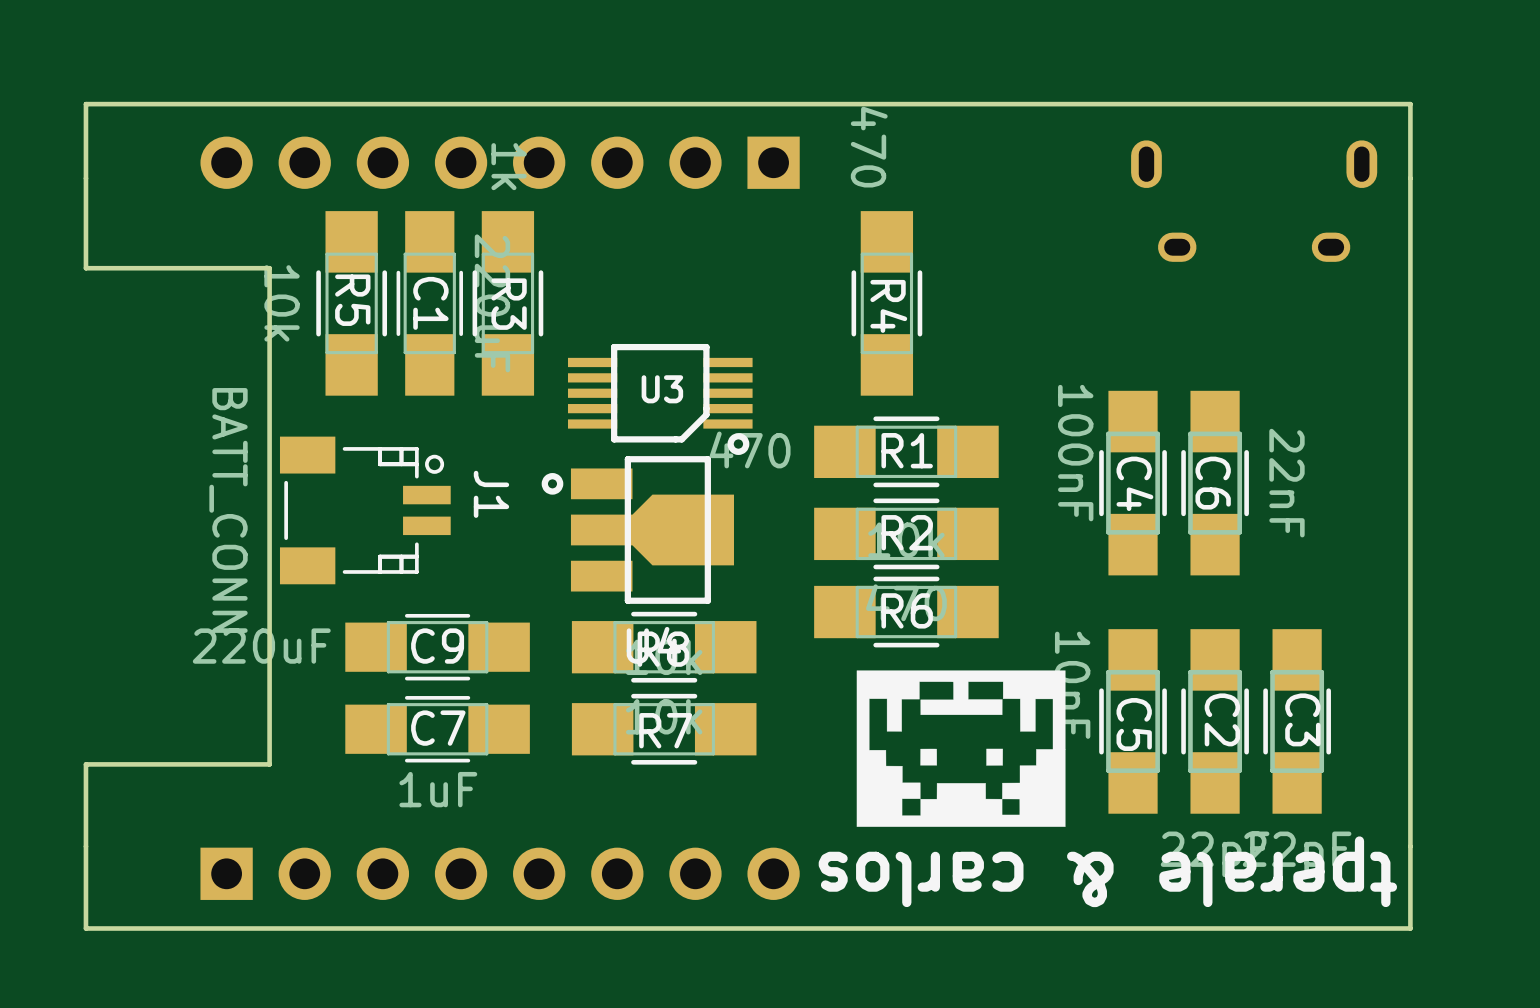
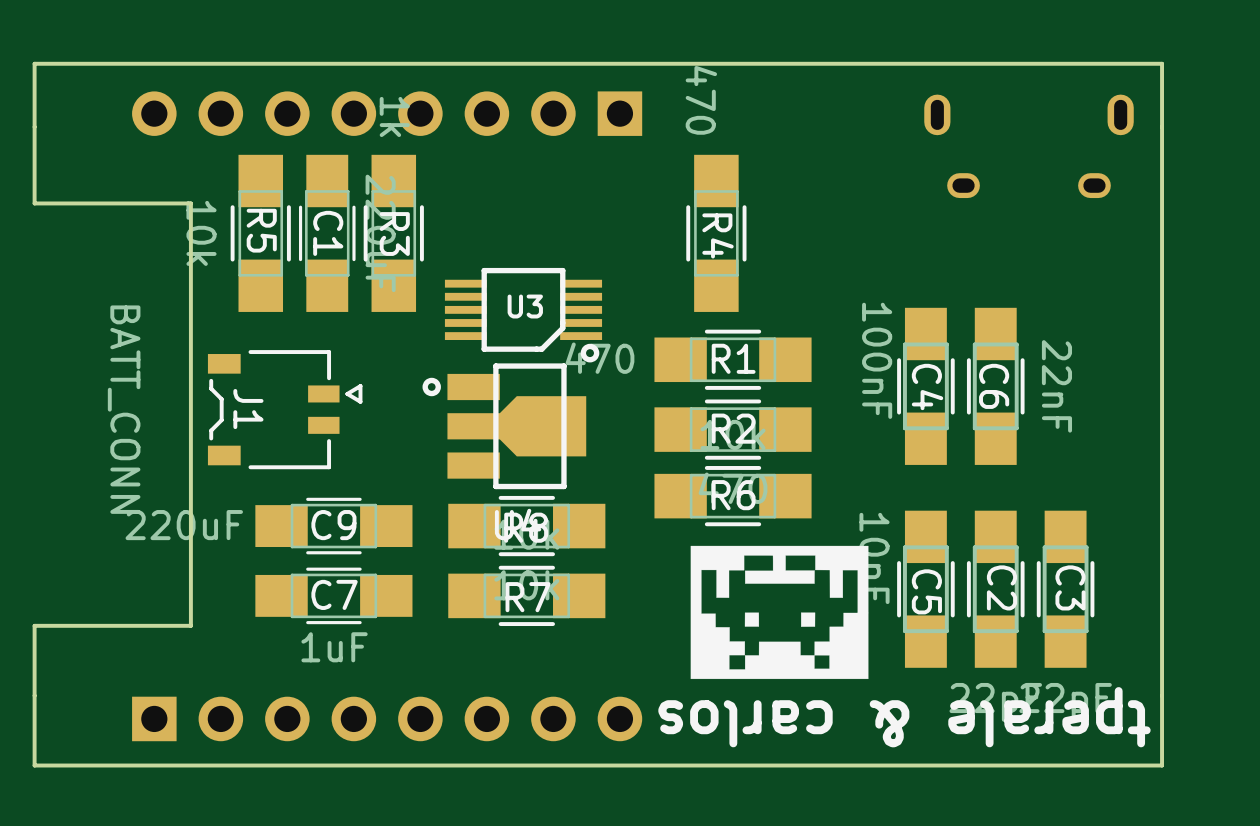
J1 footprint: [279, 436, 451, 585] -> [207, 350, 363, 470]
J1 name position: J1 (491, 494) -> J1 (248, 409)

